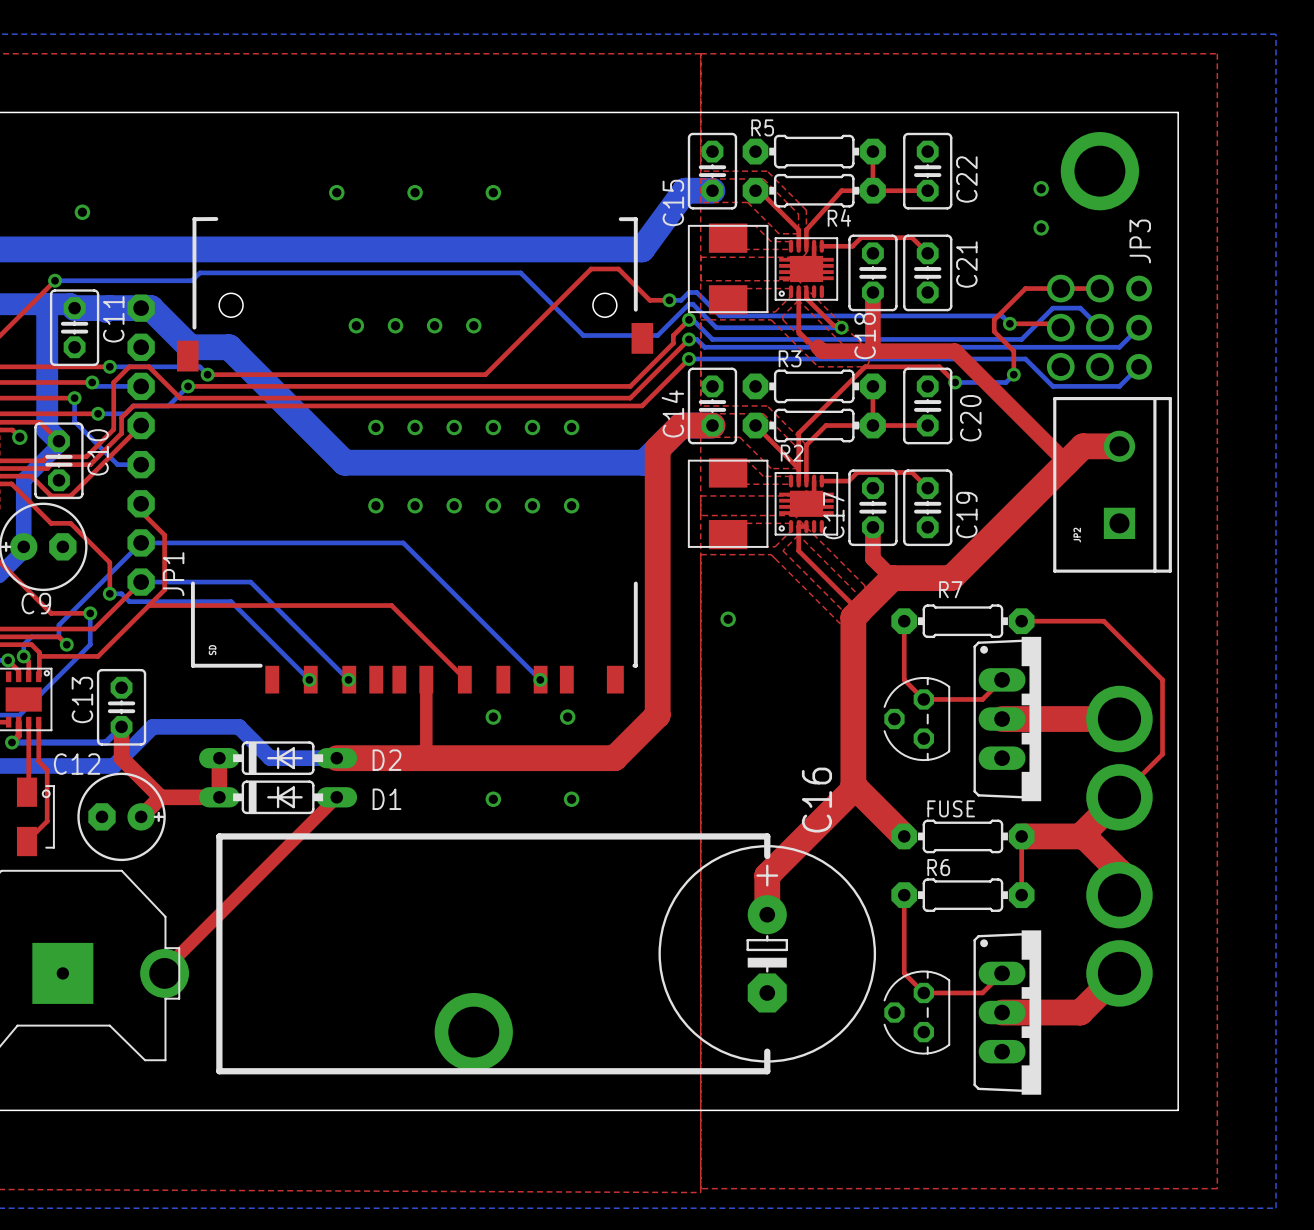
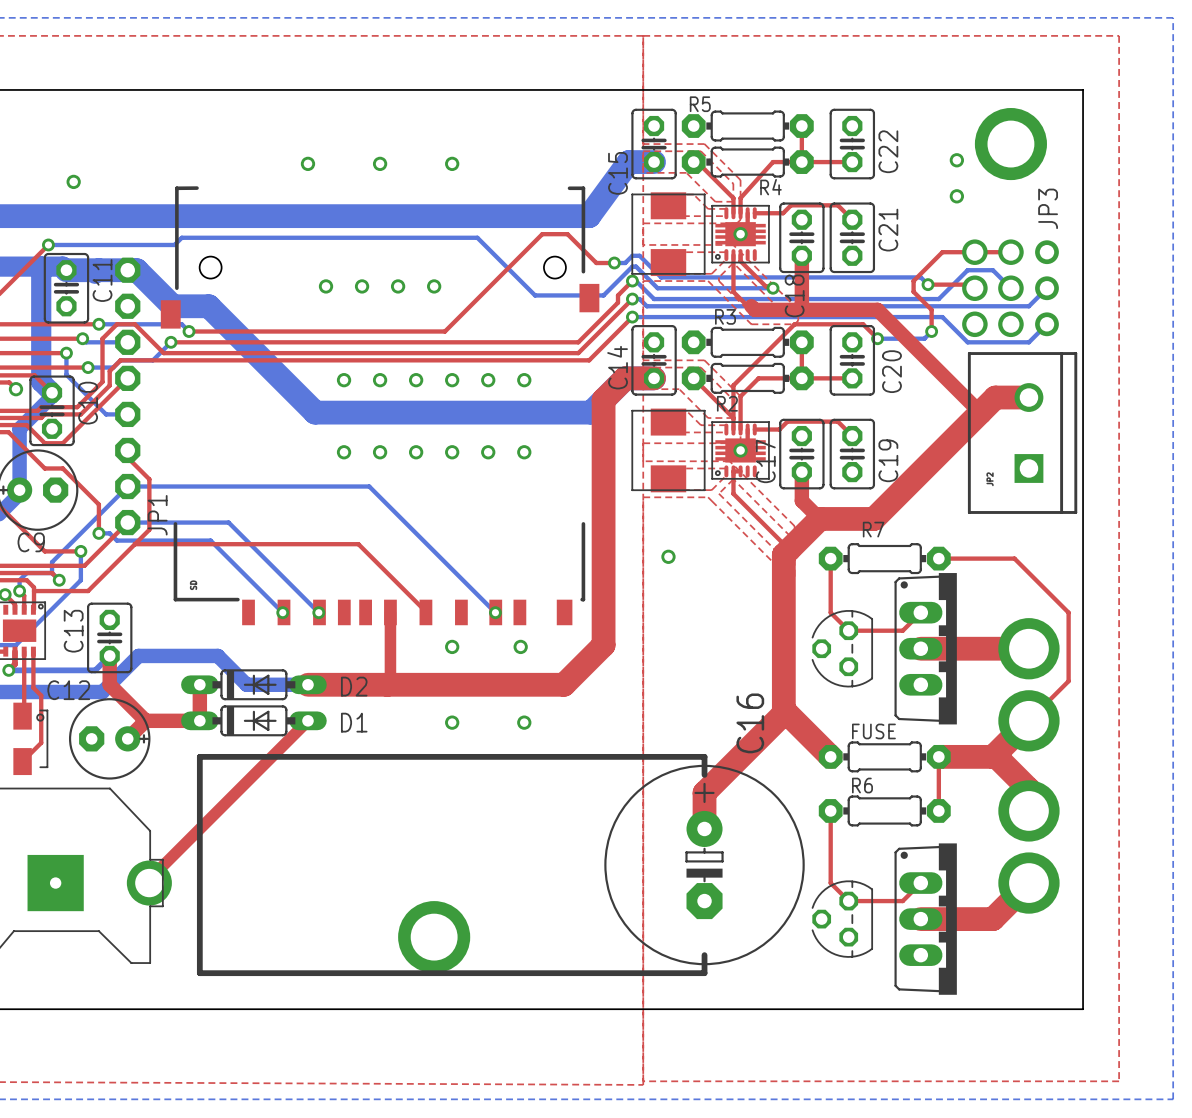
via: none -> (740, 234)
via: none -> (740, 450)

